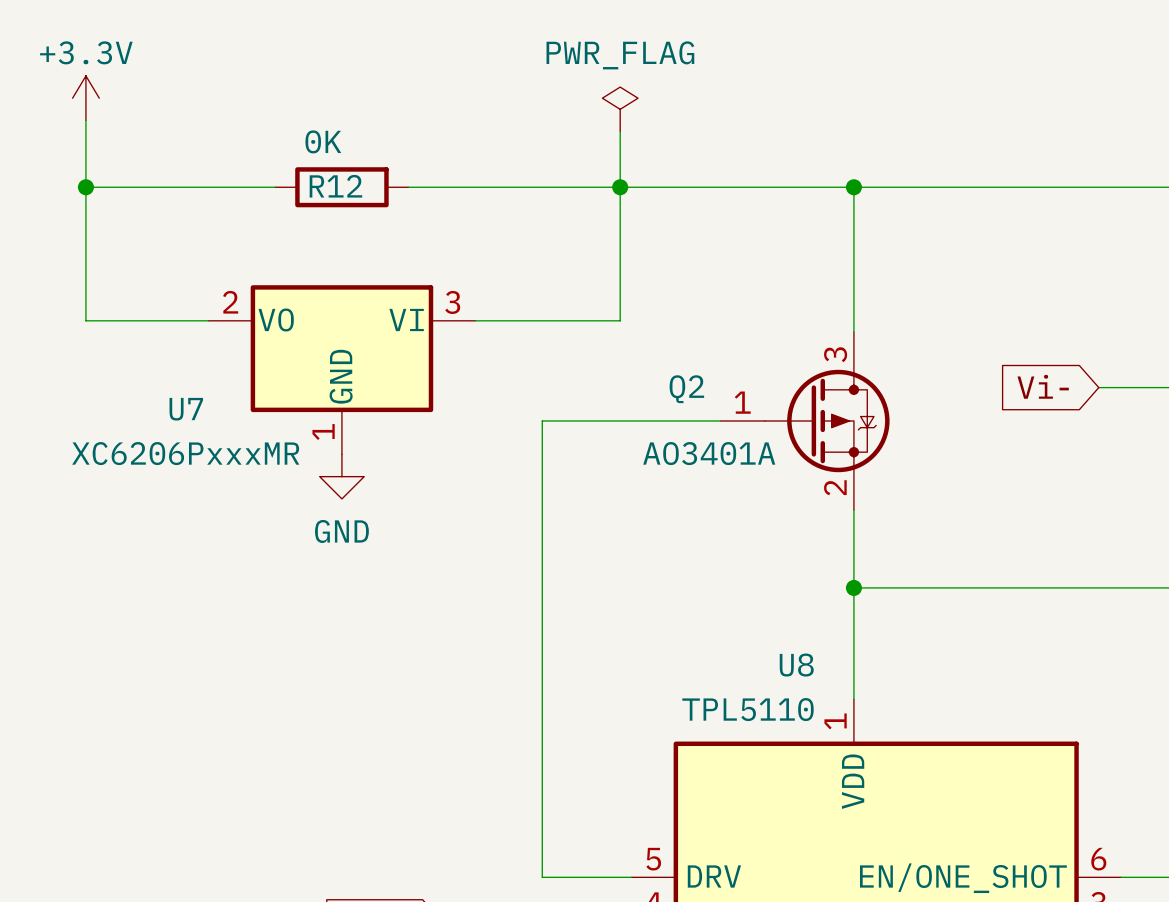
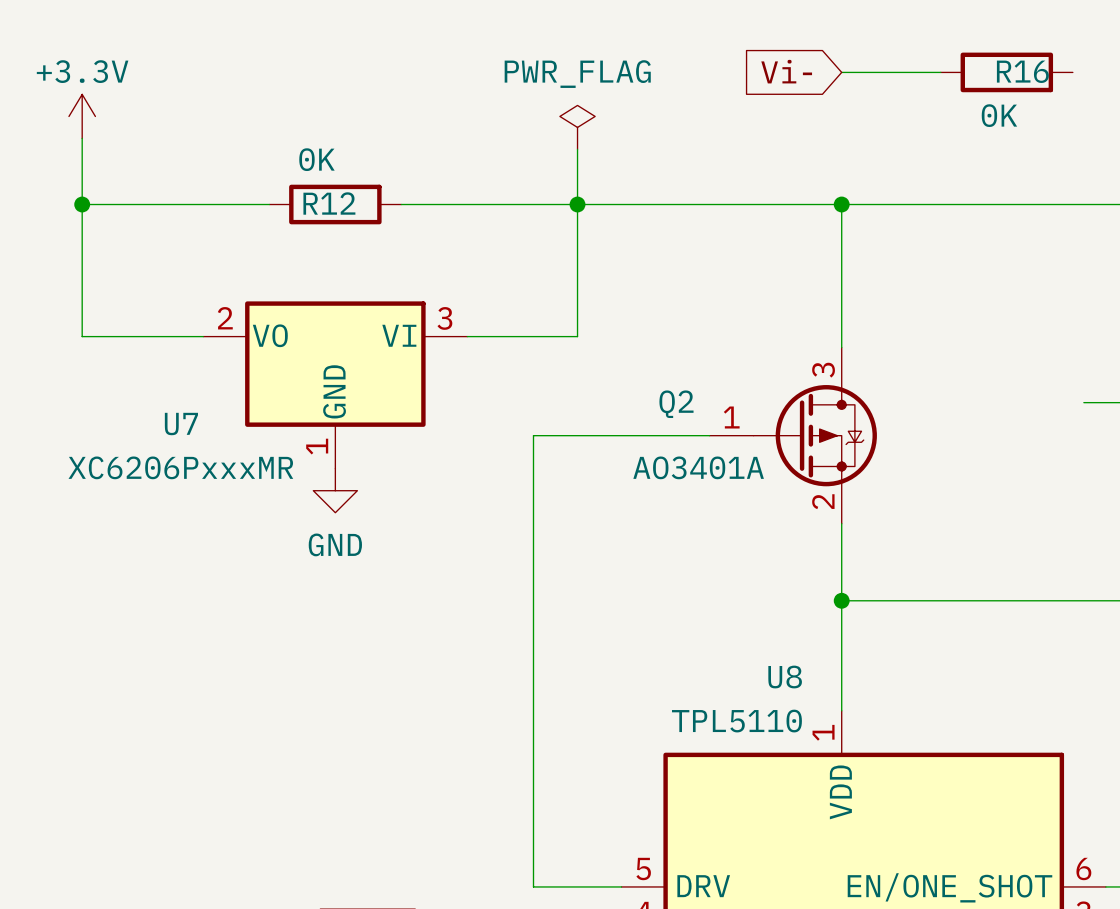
wire: none -> (841, 72) (940, 72)
R16: none -> 0K (1006, 72)
power symbol position: PWR_FLAG (620, 109) -> PWR_FLAG (577, 127)
wire: (620, 131) (620, 320) (586, 320) -> (577, 149) (577, 336)
junction position: (620, 187) -> (577, 204)
global label position: Vi- (1043, 386) -> Vi- (786, 71)

